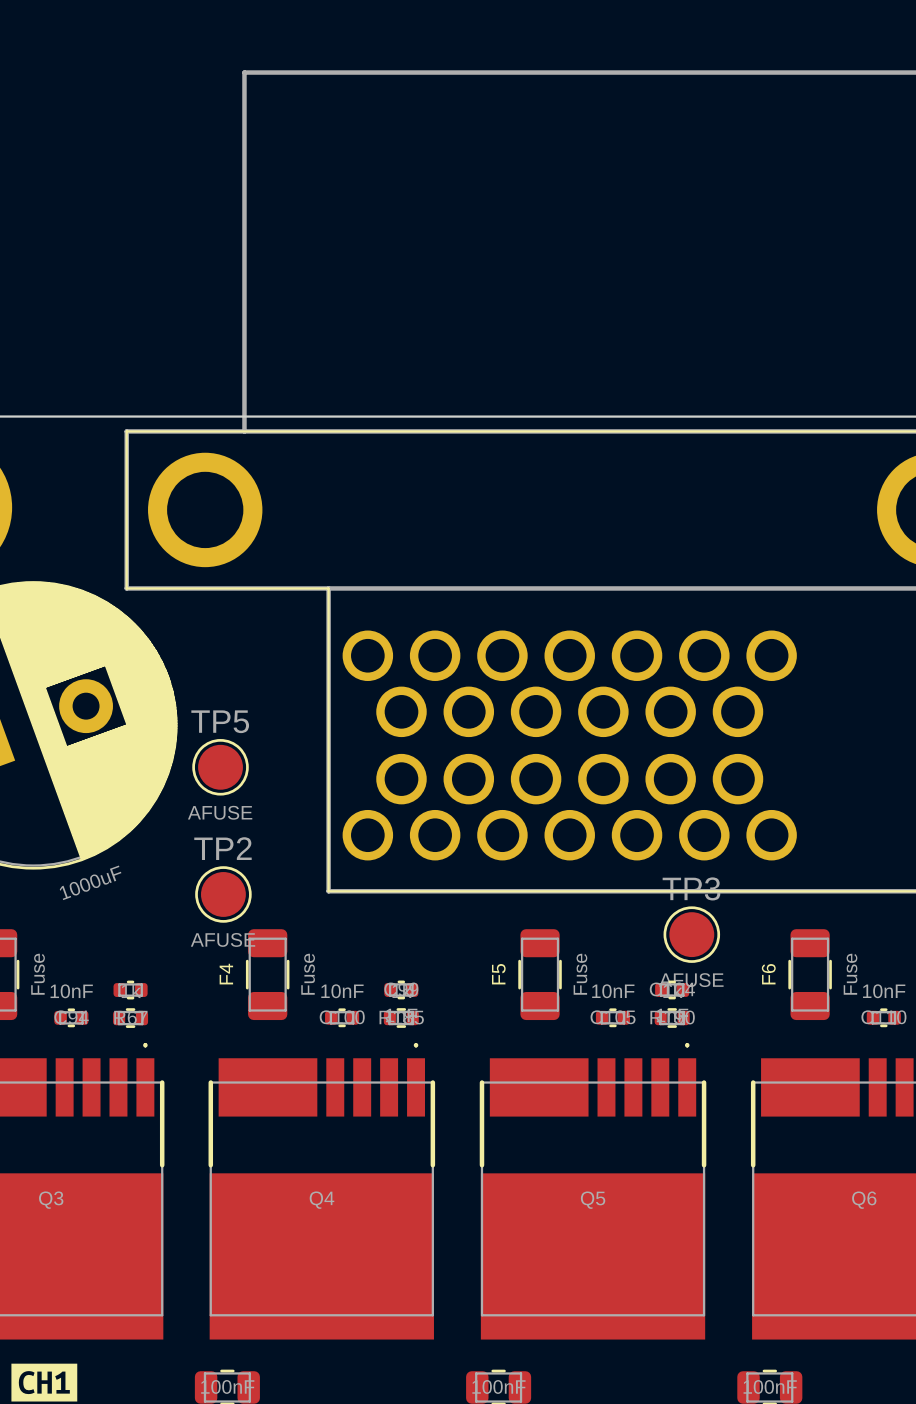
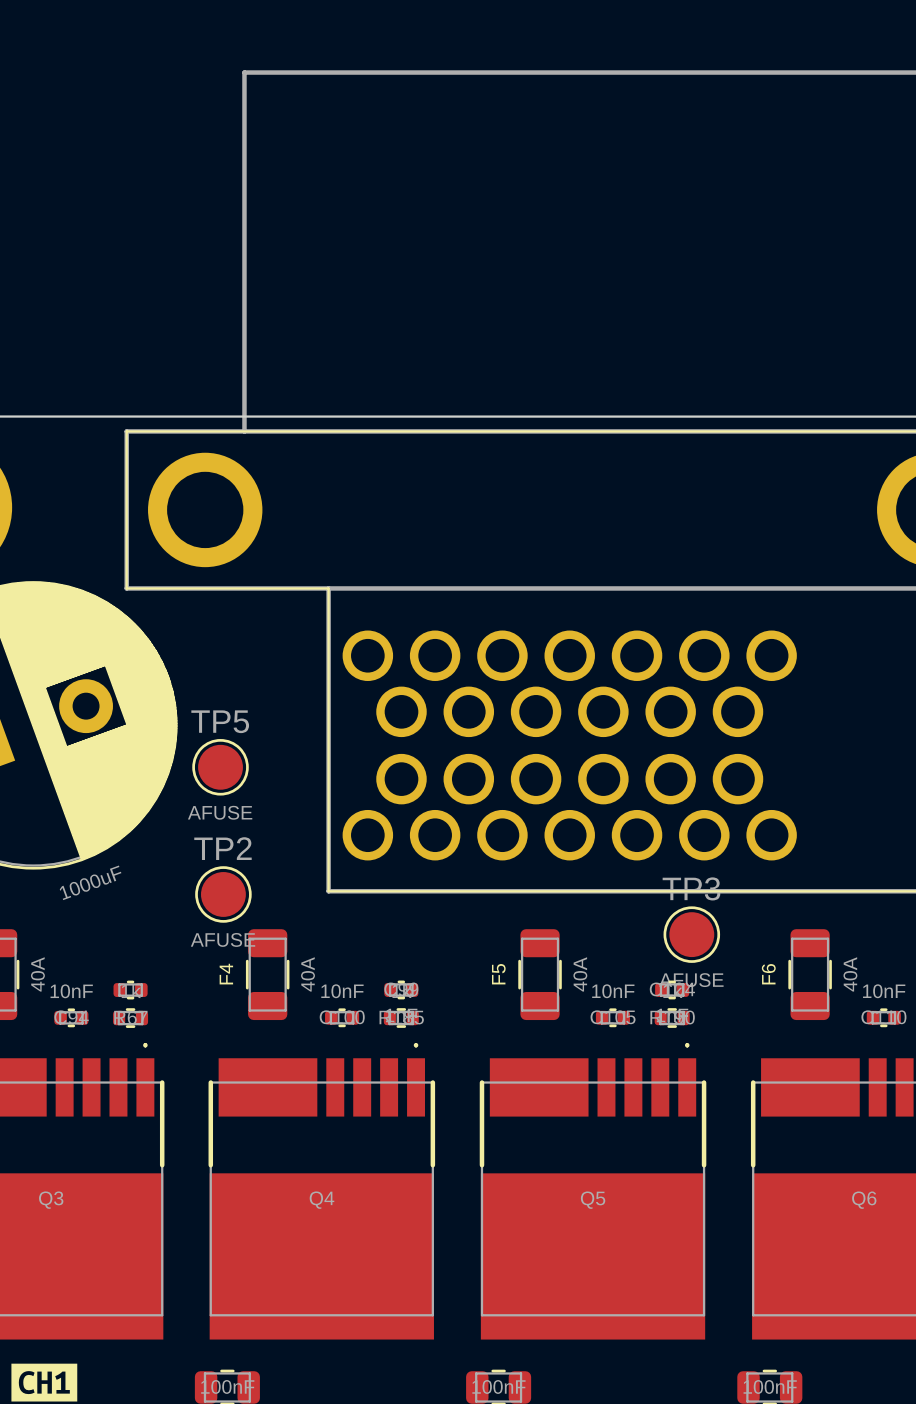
part value: Fuse (38, 974) -> 40A (37, 974)
F4 value: Fuse (308, 974) -> 40A (308, 974)
F5 value: Fuse (580, 974) -> 40A (580, 974)
F6 value: Fuse (850, 974) -> 40A (850, 974)

